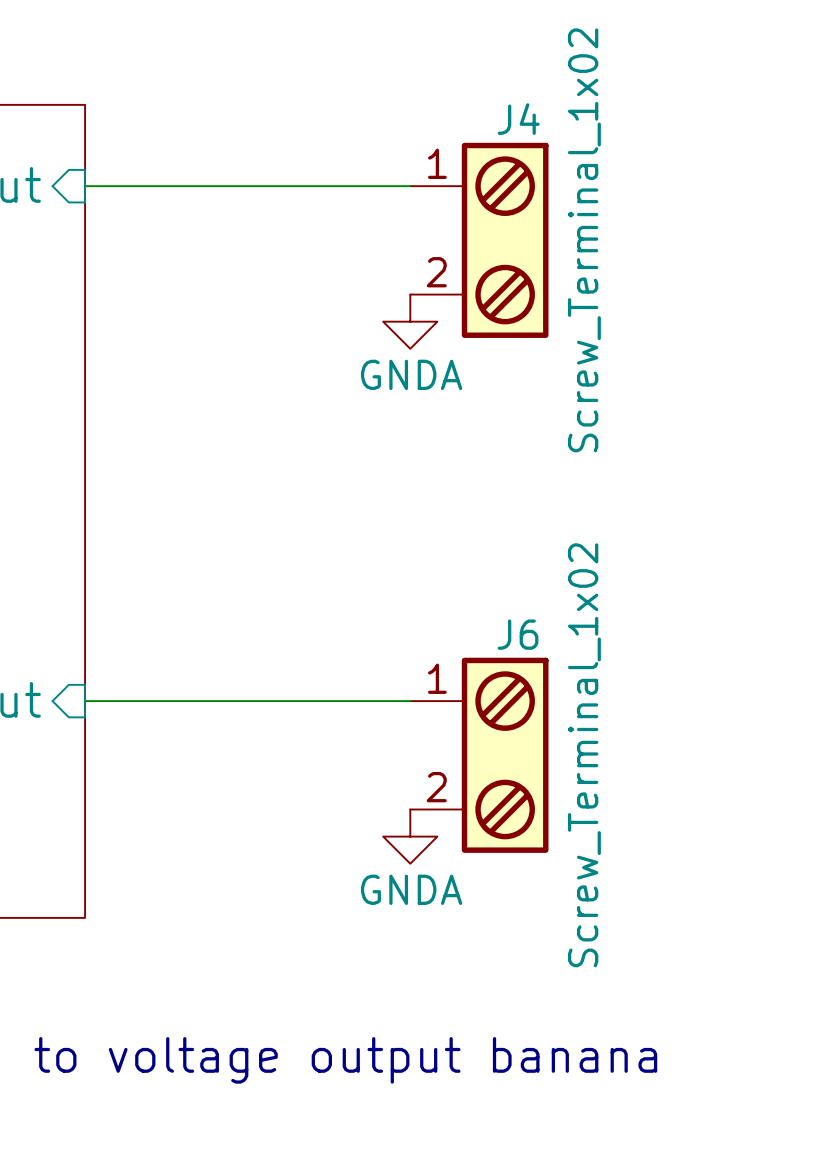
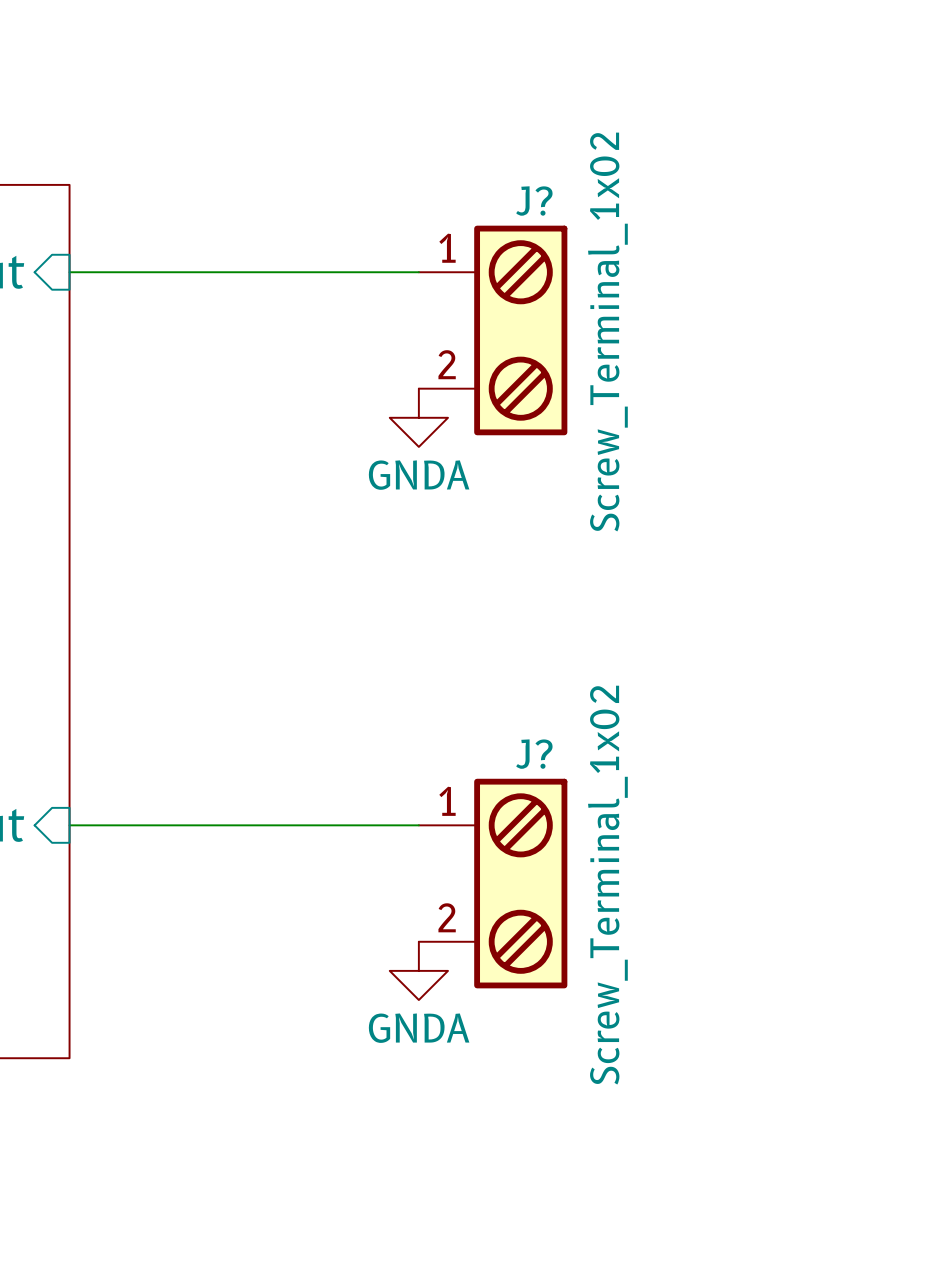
J4 name: J4 (518, 119) -> J? (534, 201)
J6 name: J6 (518, 634) -> J? (534, 754)
text: to voltage output banana (345, 1060) -> none

